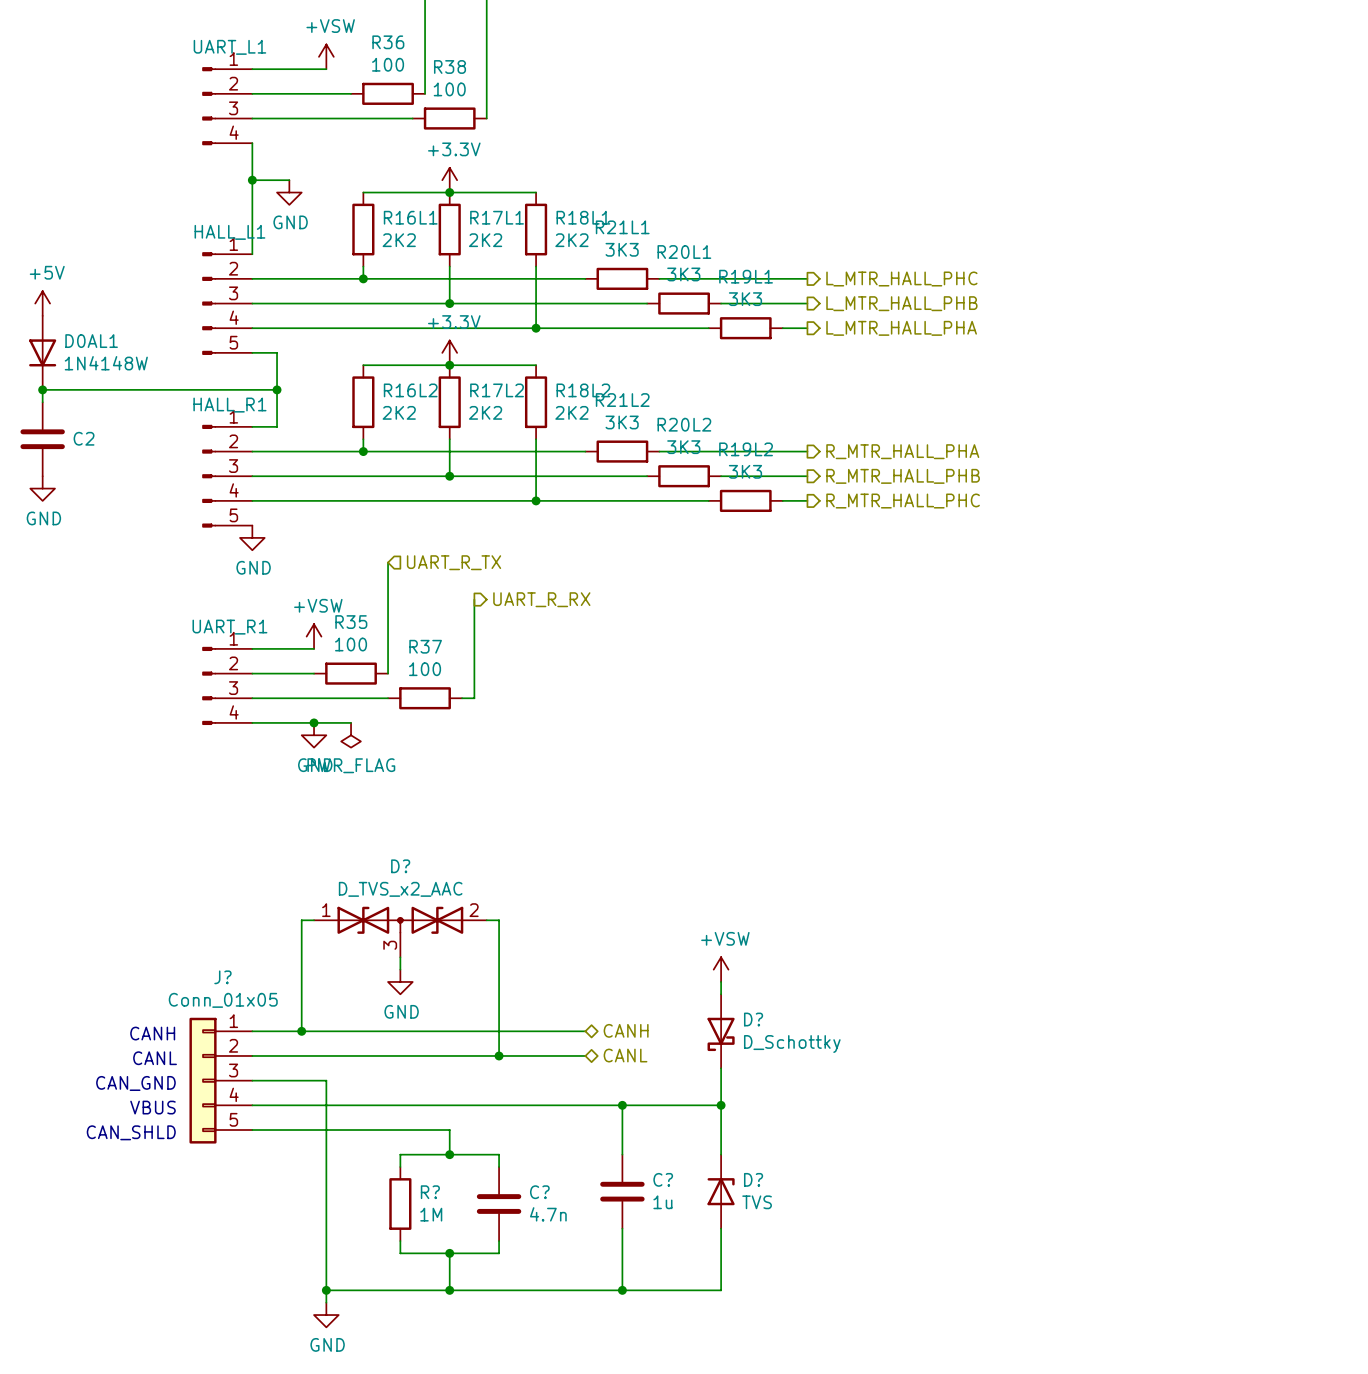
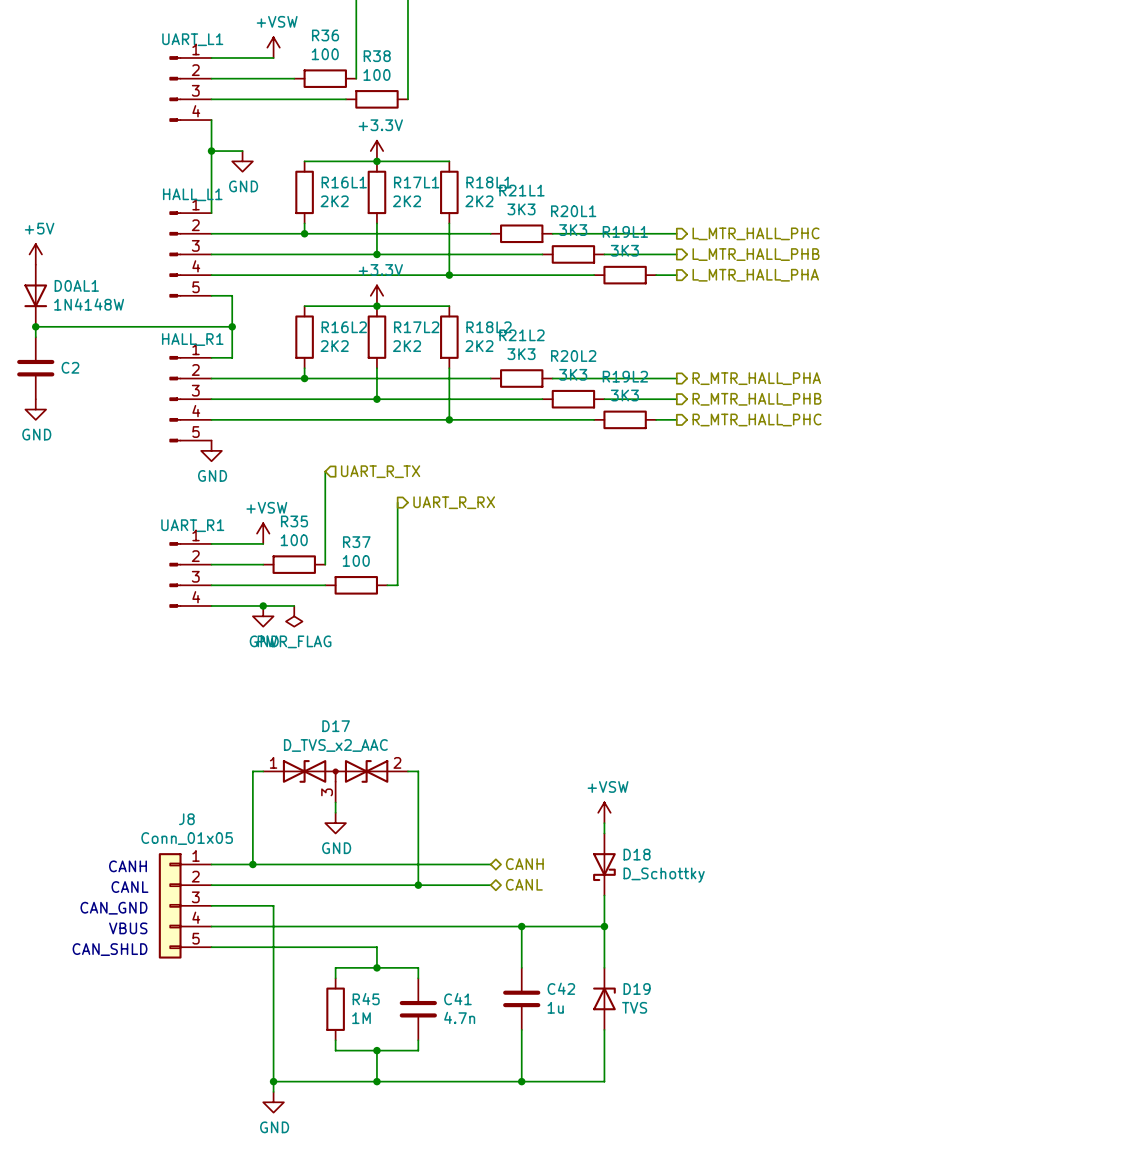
D? name: D? (400, 866) -> D17 (336, 726)
J? name: J? (222, 977) -> J8 (186, 819)
D? name: D? (753, 1019) -> D18 (637, 854)
C? name: C? (663, 1179) -> C42 (561, 988)
D? name: D? (753, 1179) -> D19 (637, 989)
R? name: R? (430, 1192) -> R45 (366, 999)
C? name: C? (539, 1192) -> C41 (457, 999)

